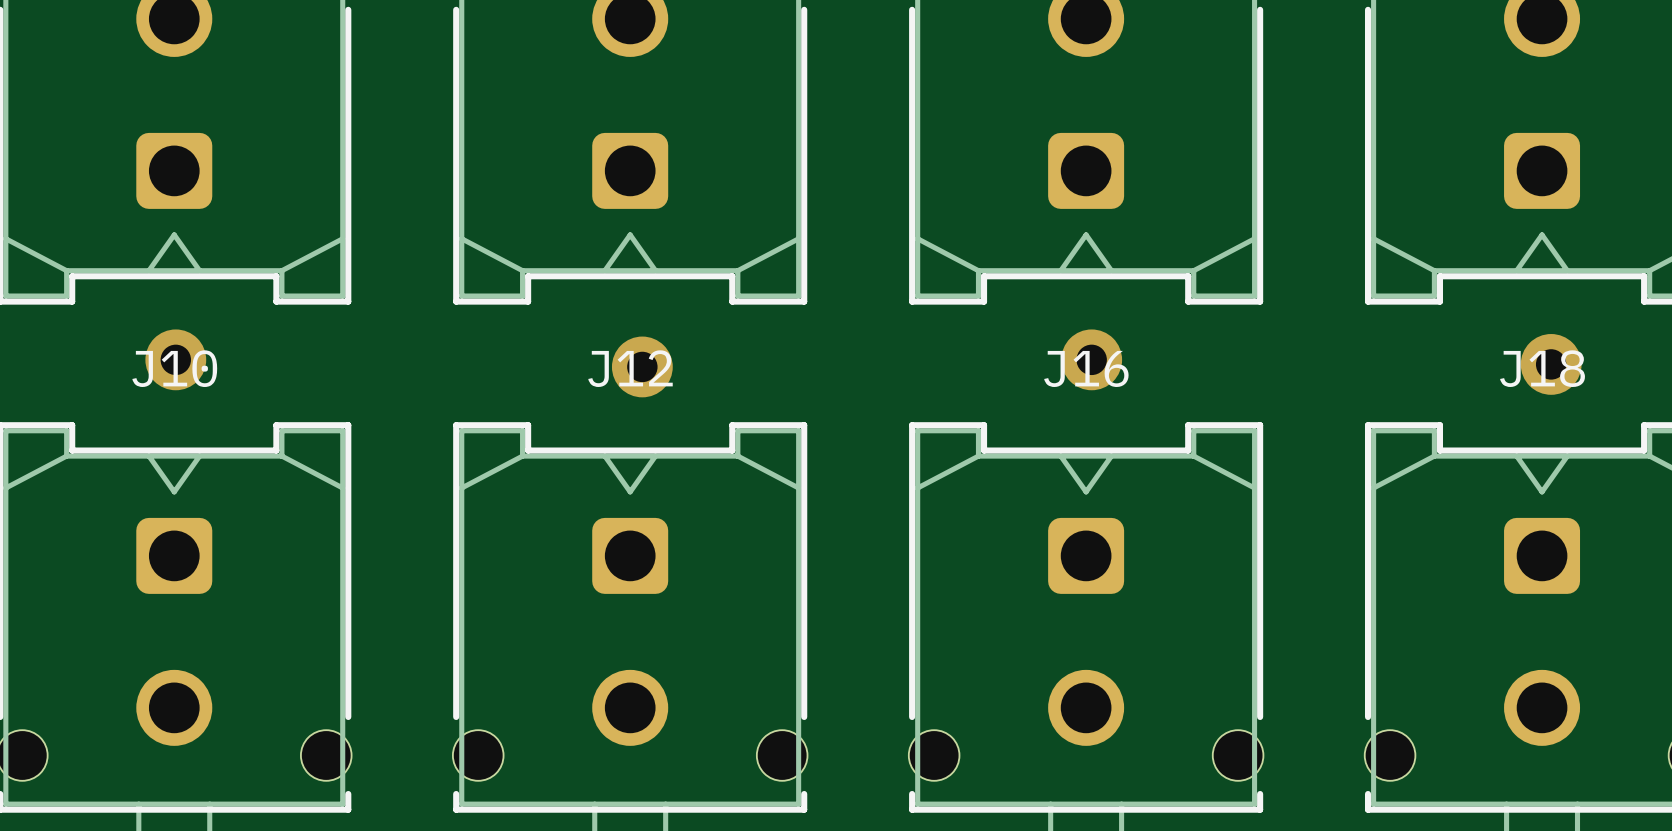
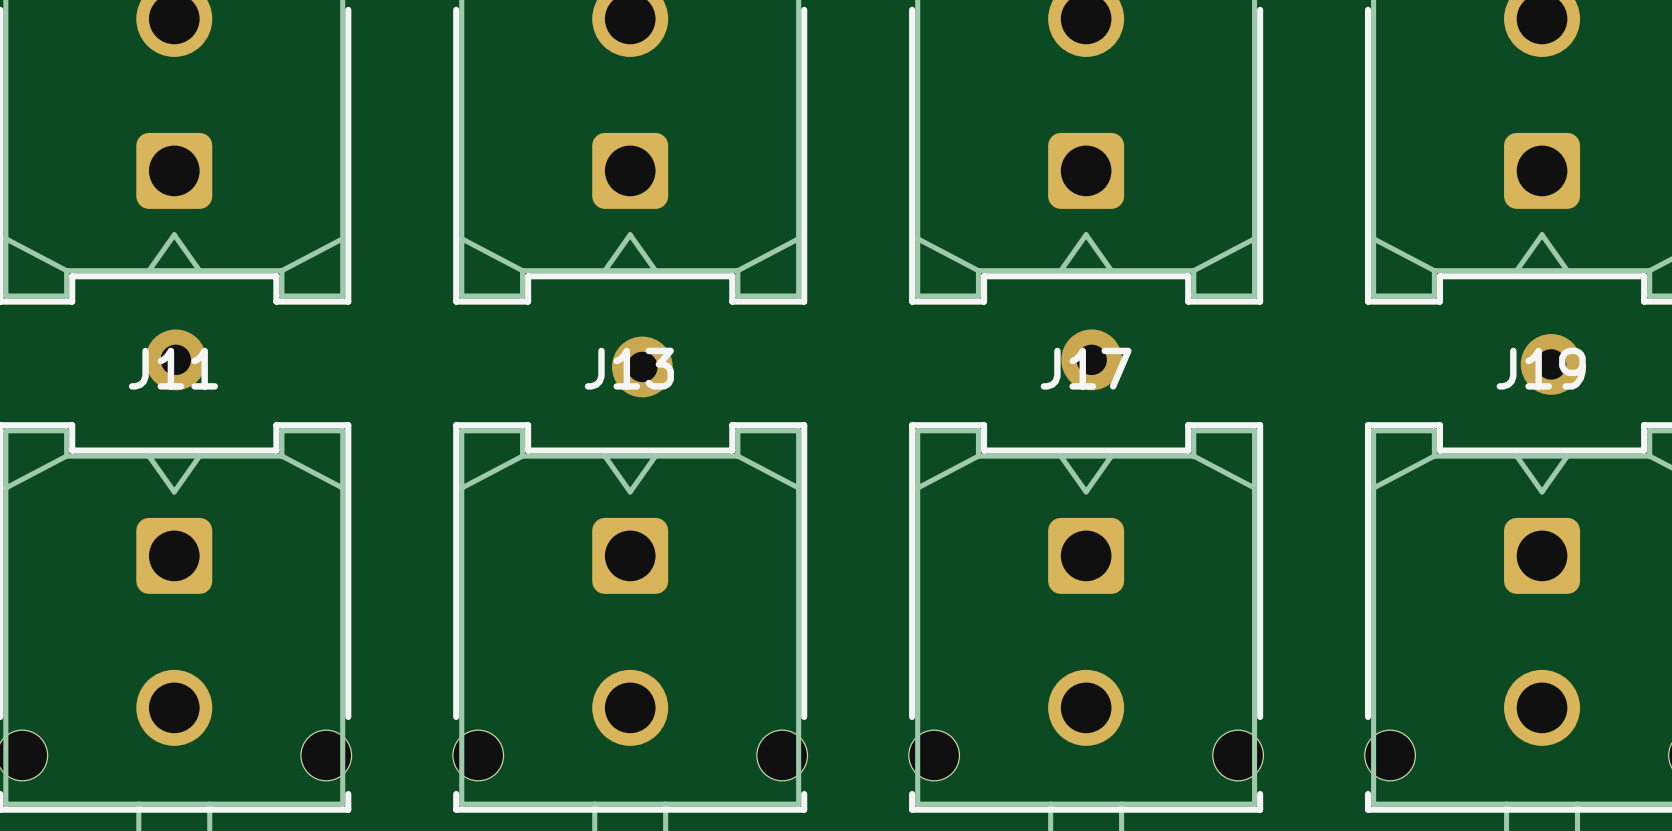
J10 name: J10 (174, 368) -> J11 (173, 368)
J12 name: J12 (630, 368) -> J13 (629, 368)
J16 name: J16 (1086, 368) -> J17 (1086, 368)
J18 name: J18 (1542, 368) -> J19 (1541, 368)

